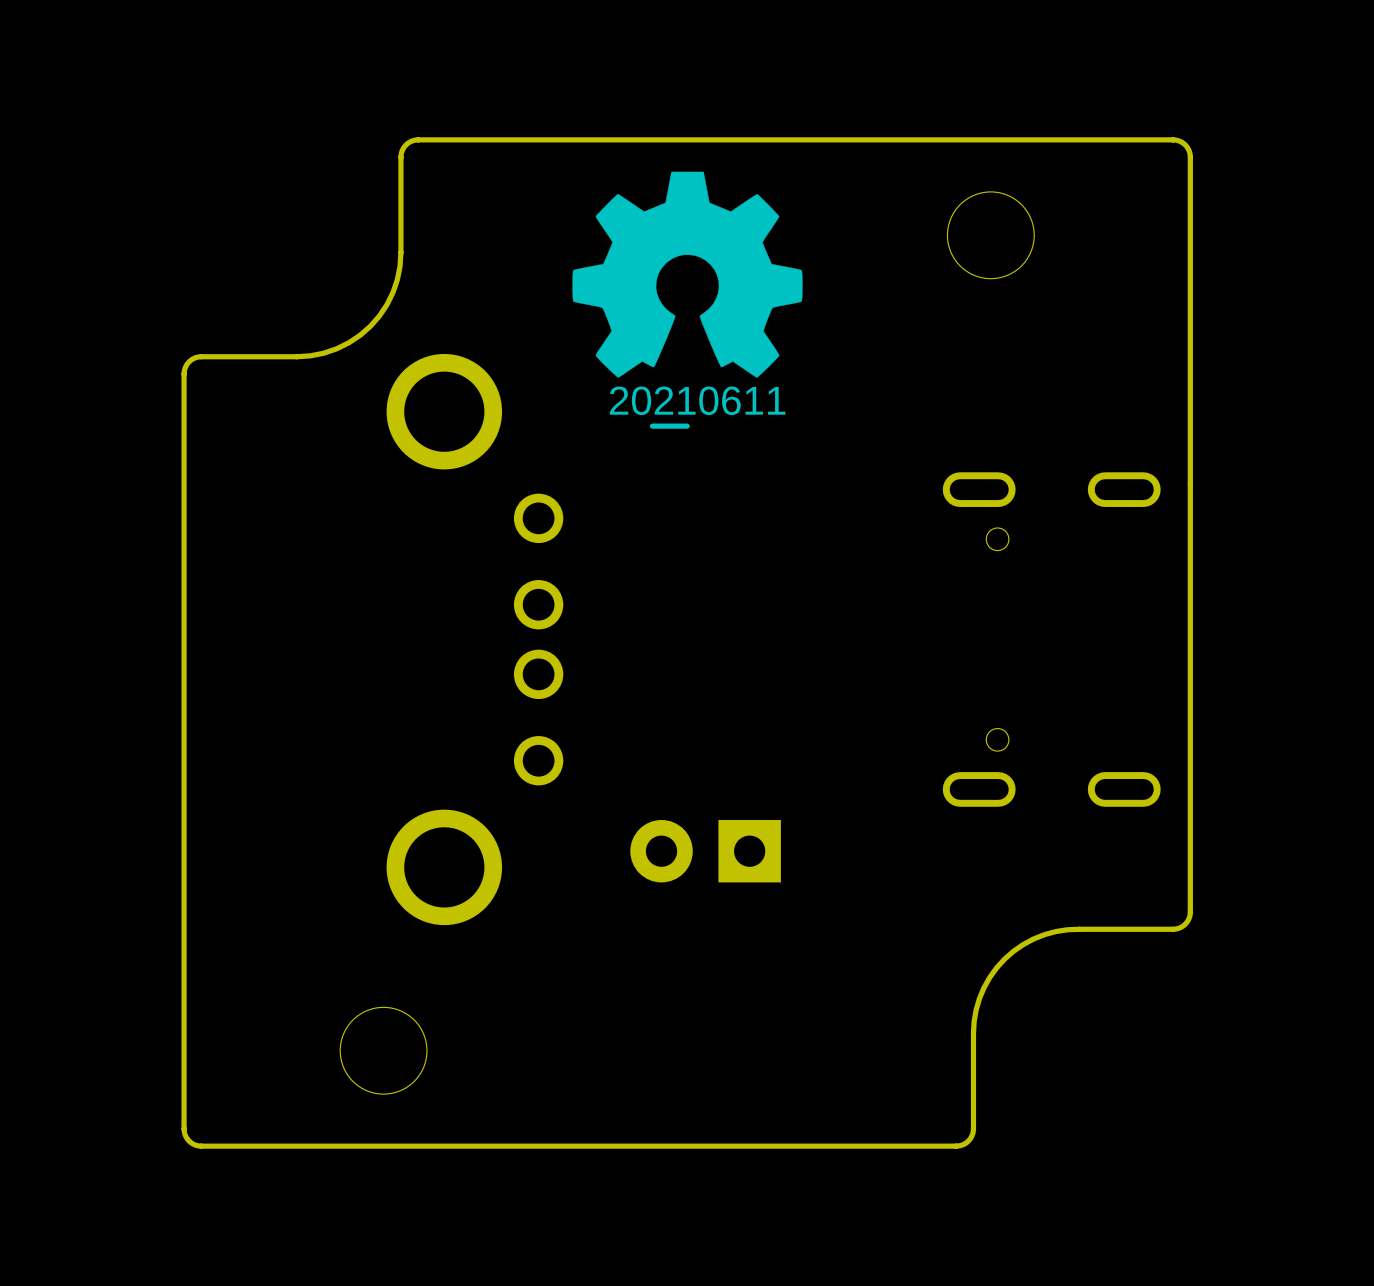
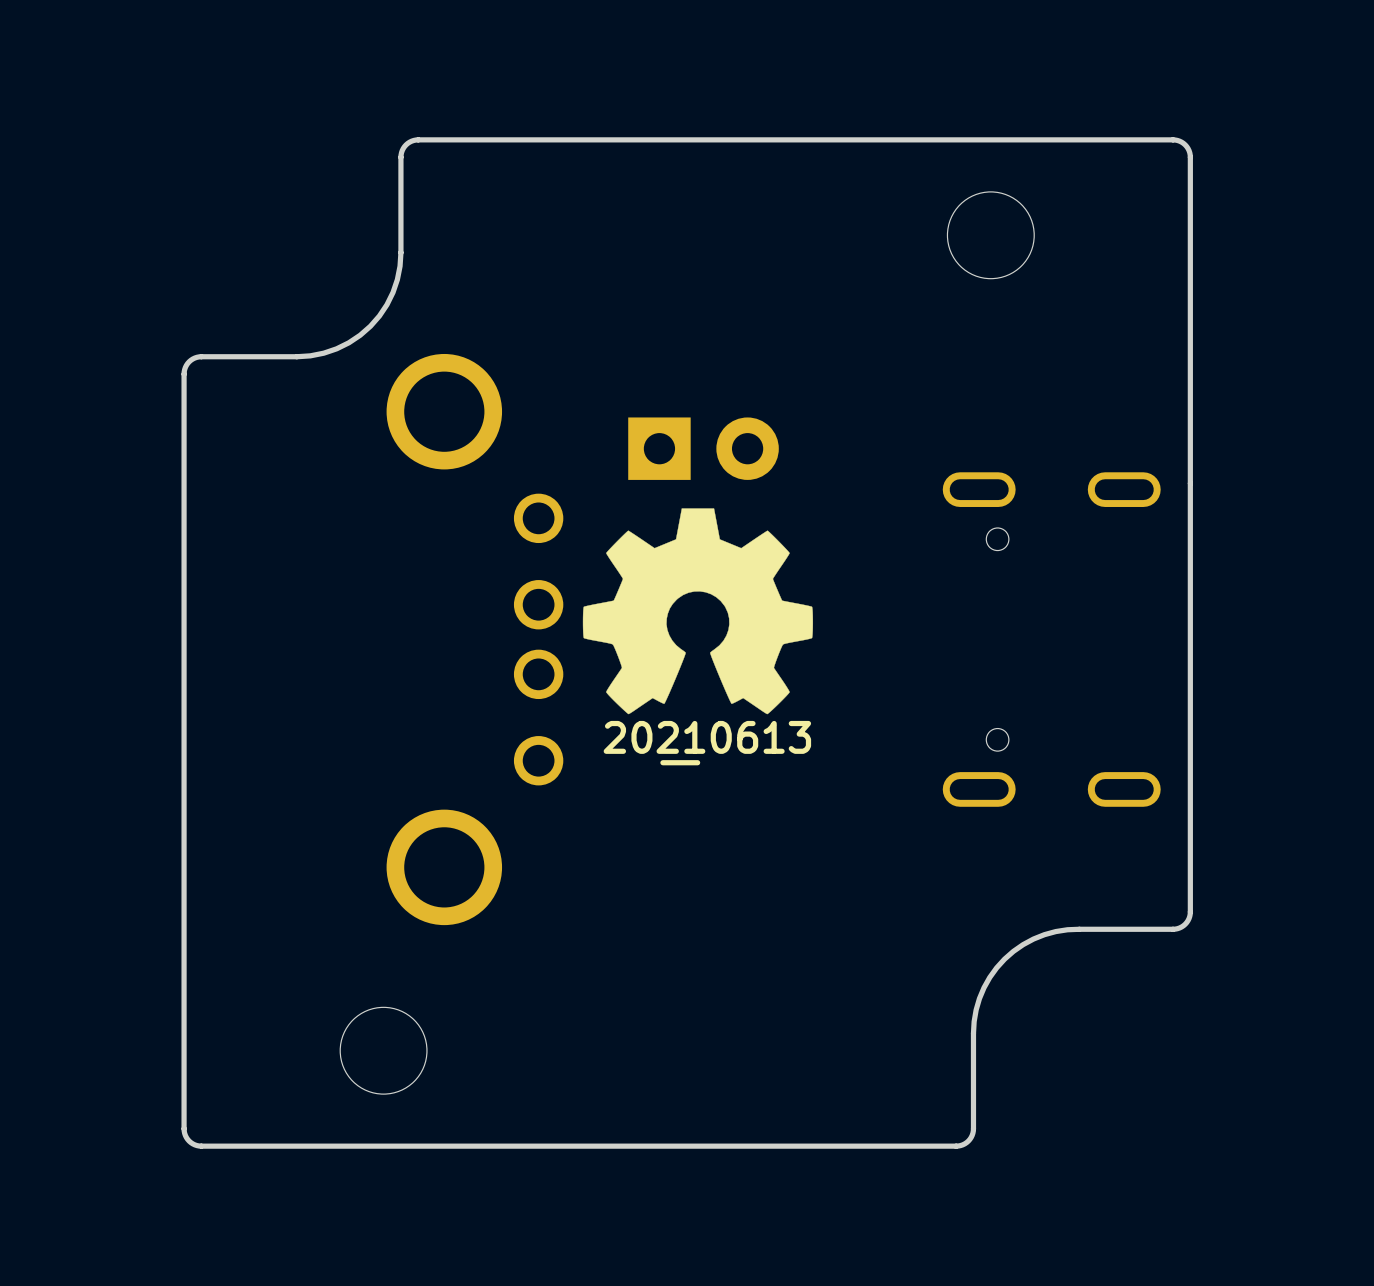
drawing position: (687, 274) -> (697, 611)
drawing: [649, 423, 690, 429] -> none
drawing: none -> [660, 760, 701, 766]
part rotation: 0° (705, 851) -> 180° (703, 448)
part position: (705, 851) -> (703, 448)

